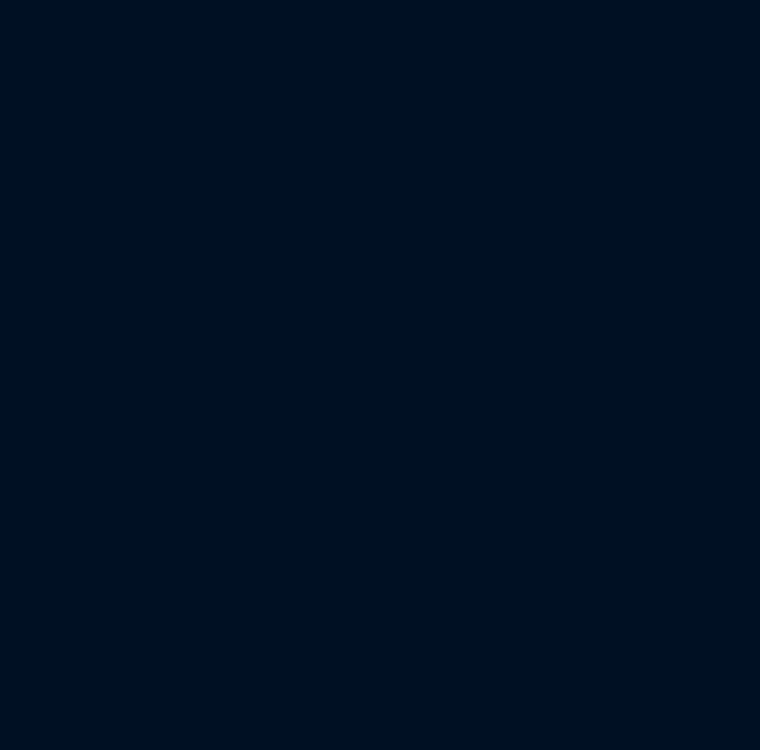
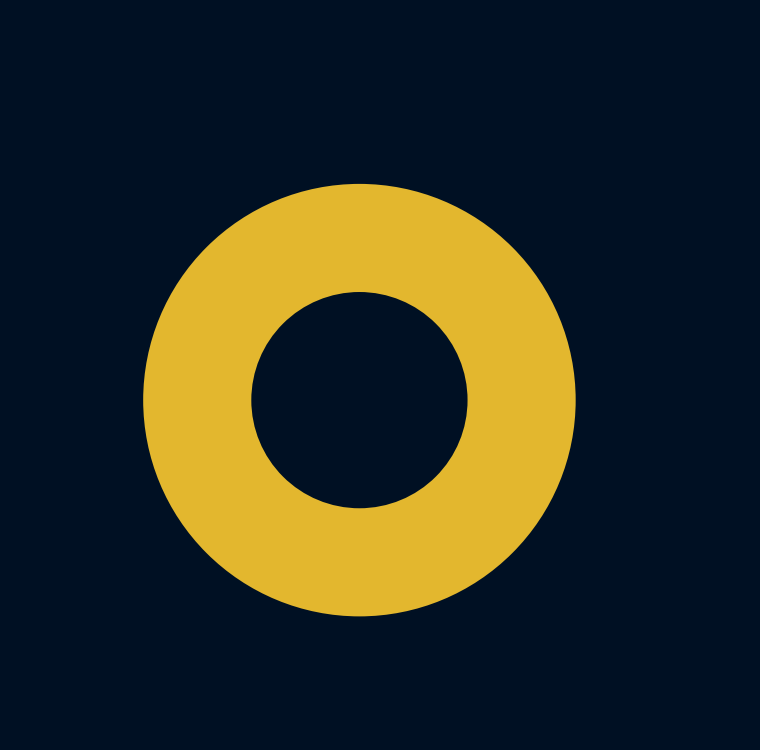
part: none -> (359, 400)

